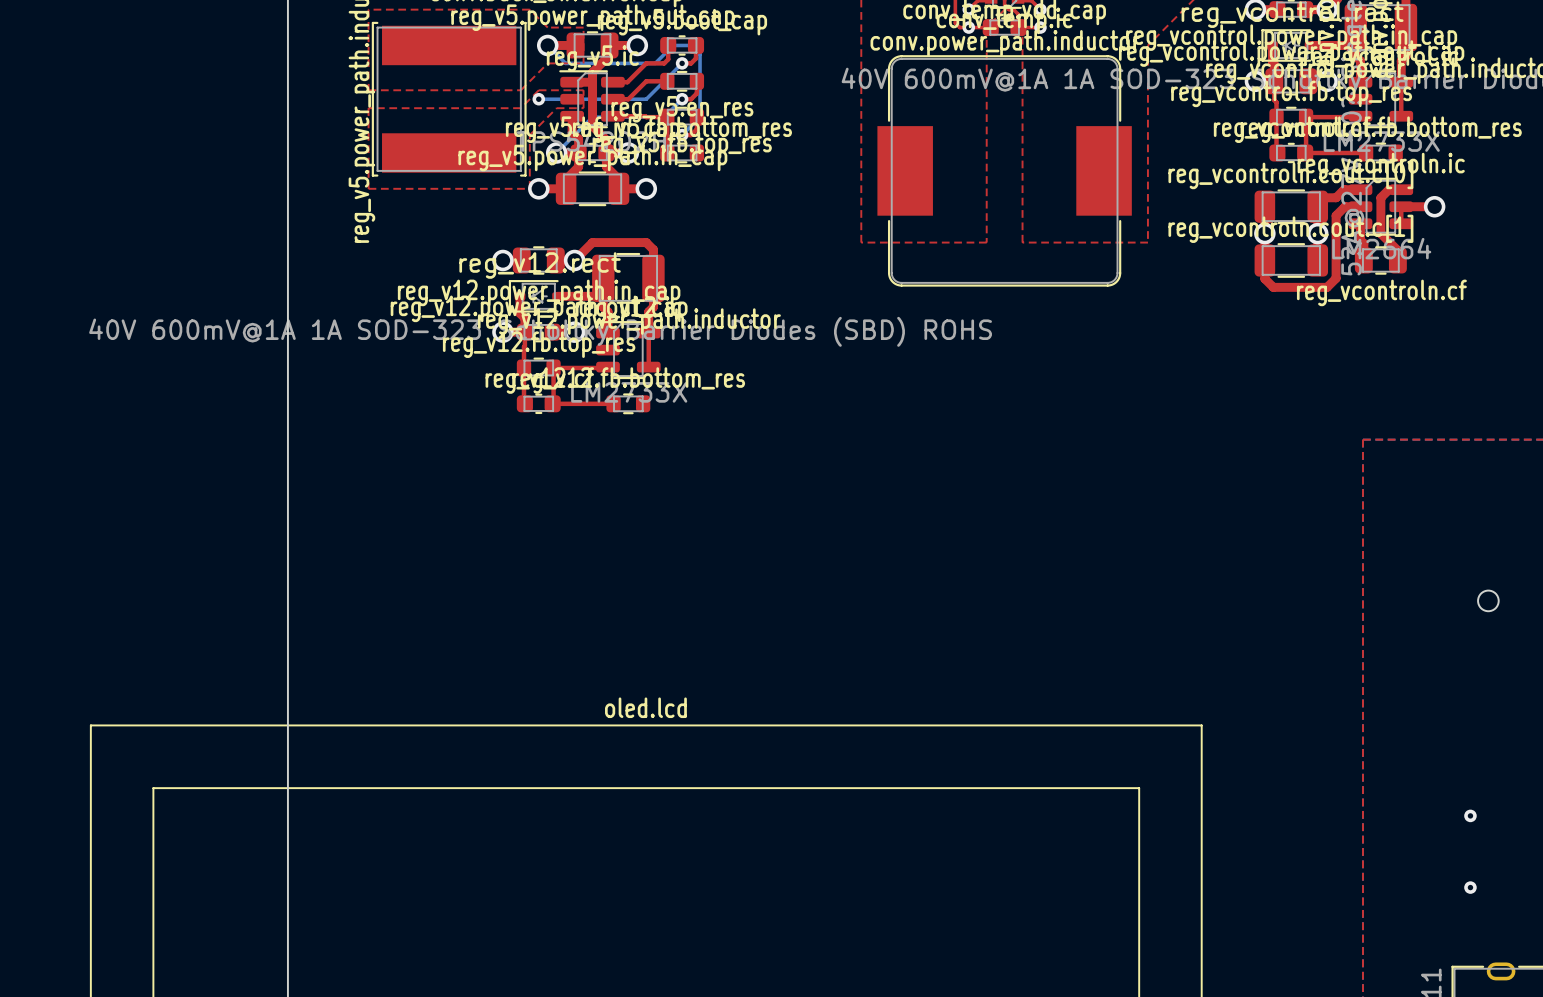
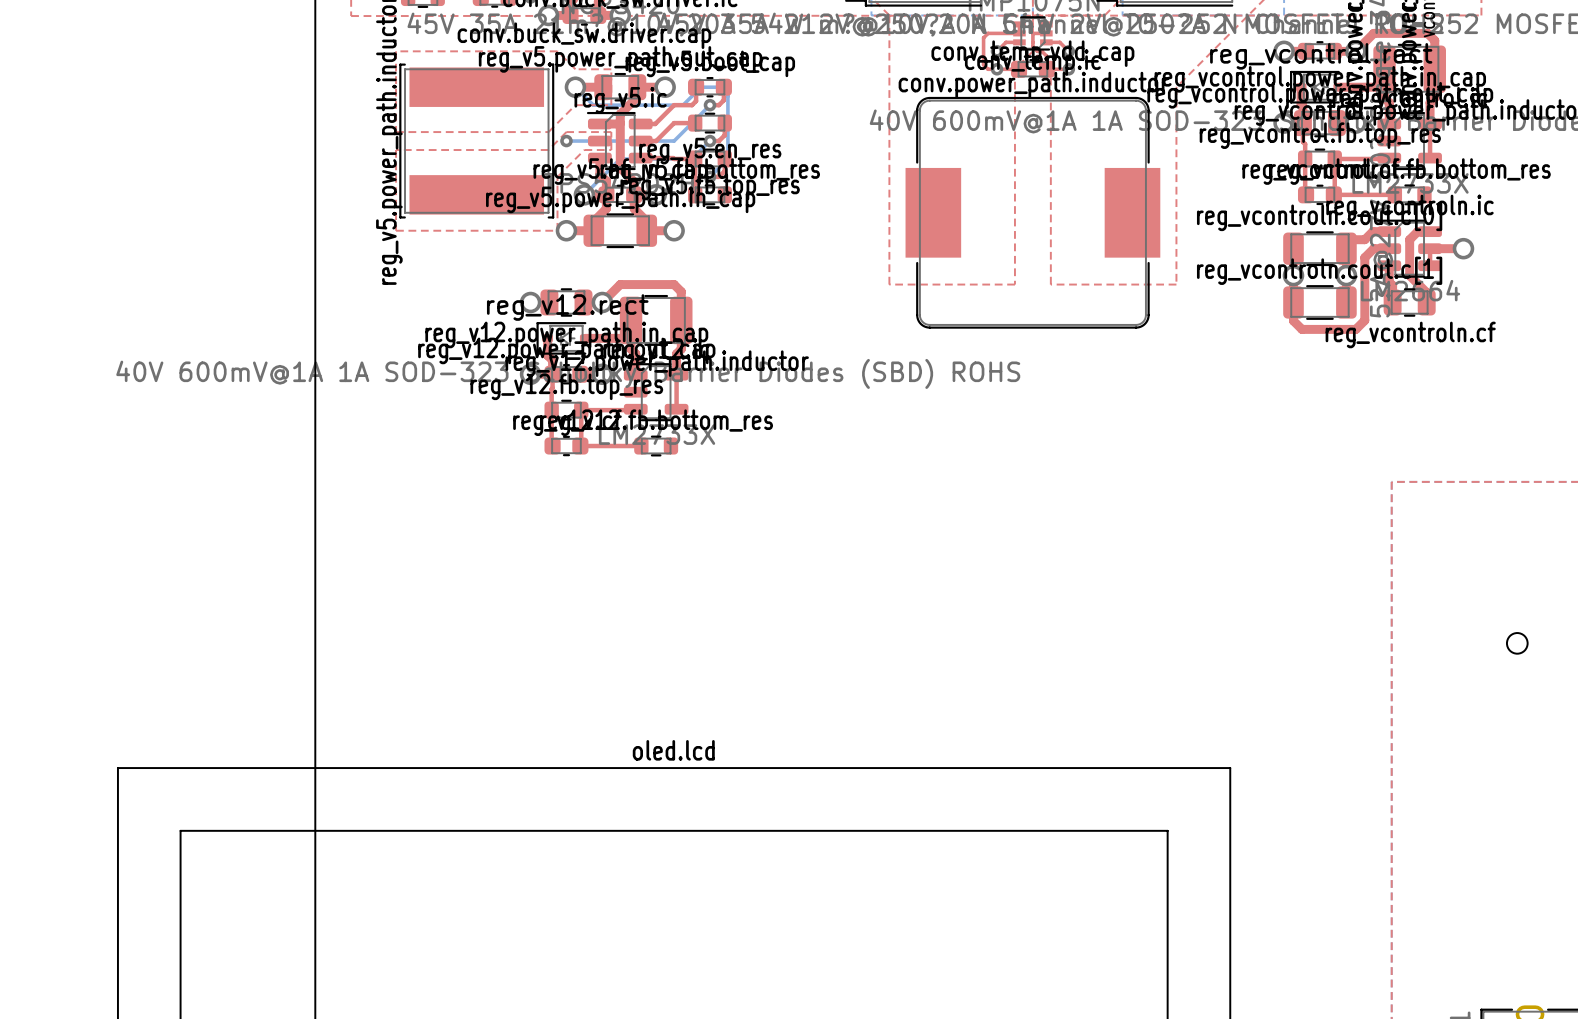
via: (1470, 815) -> none
via: (1470, 887) -> none

